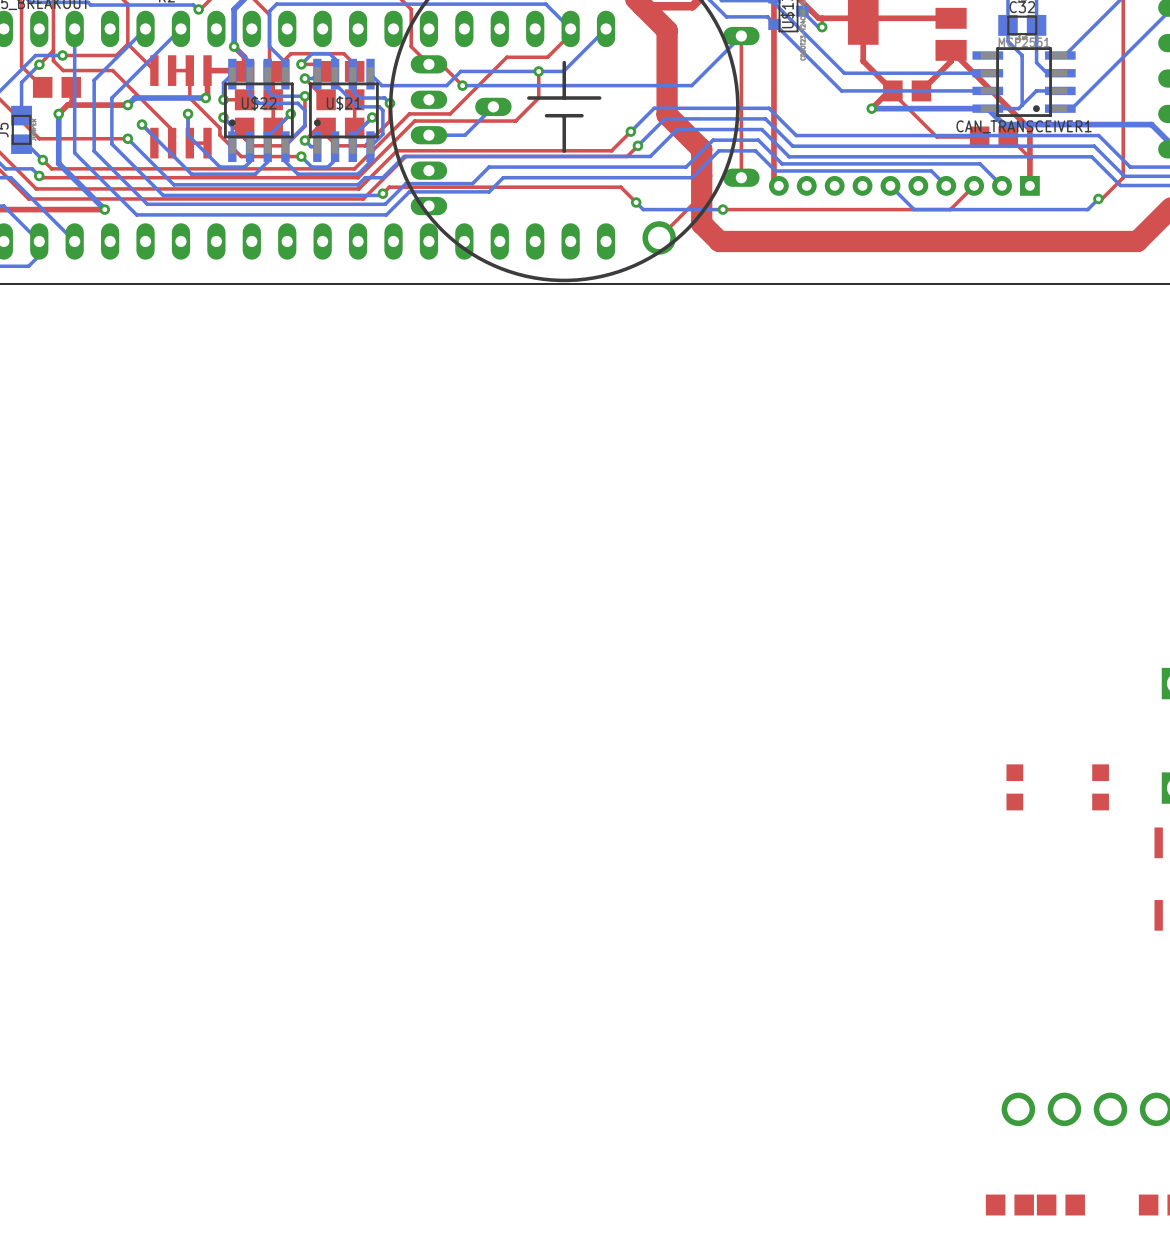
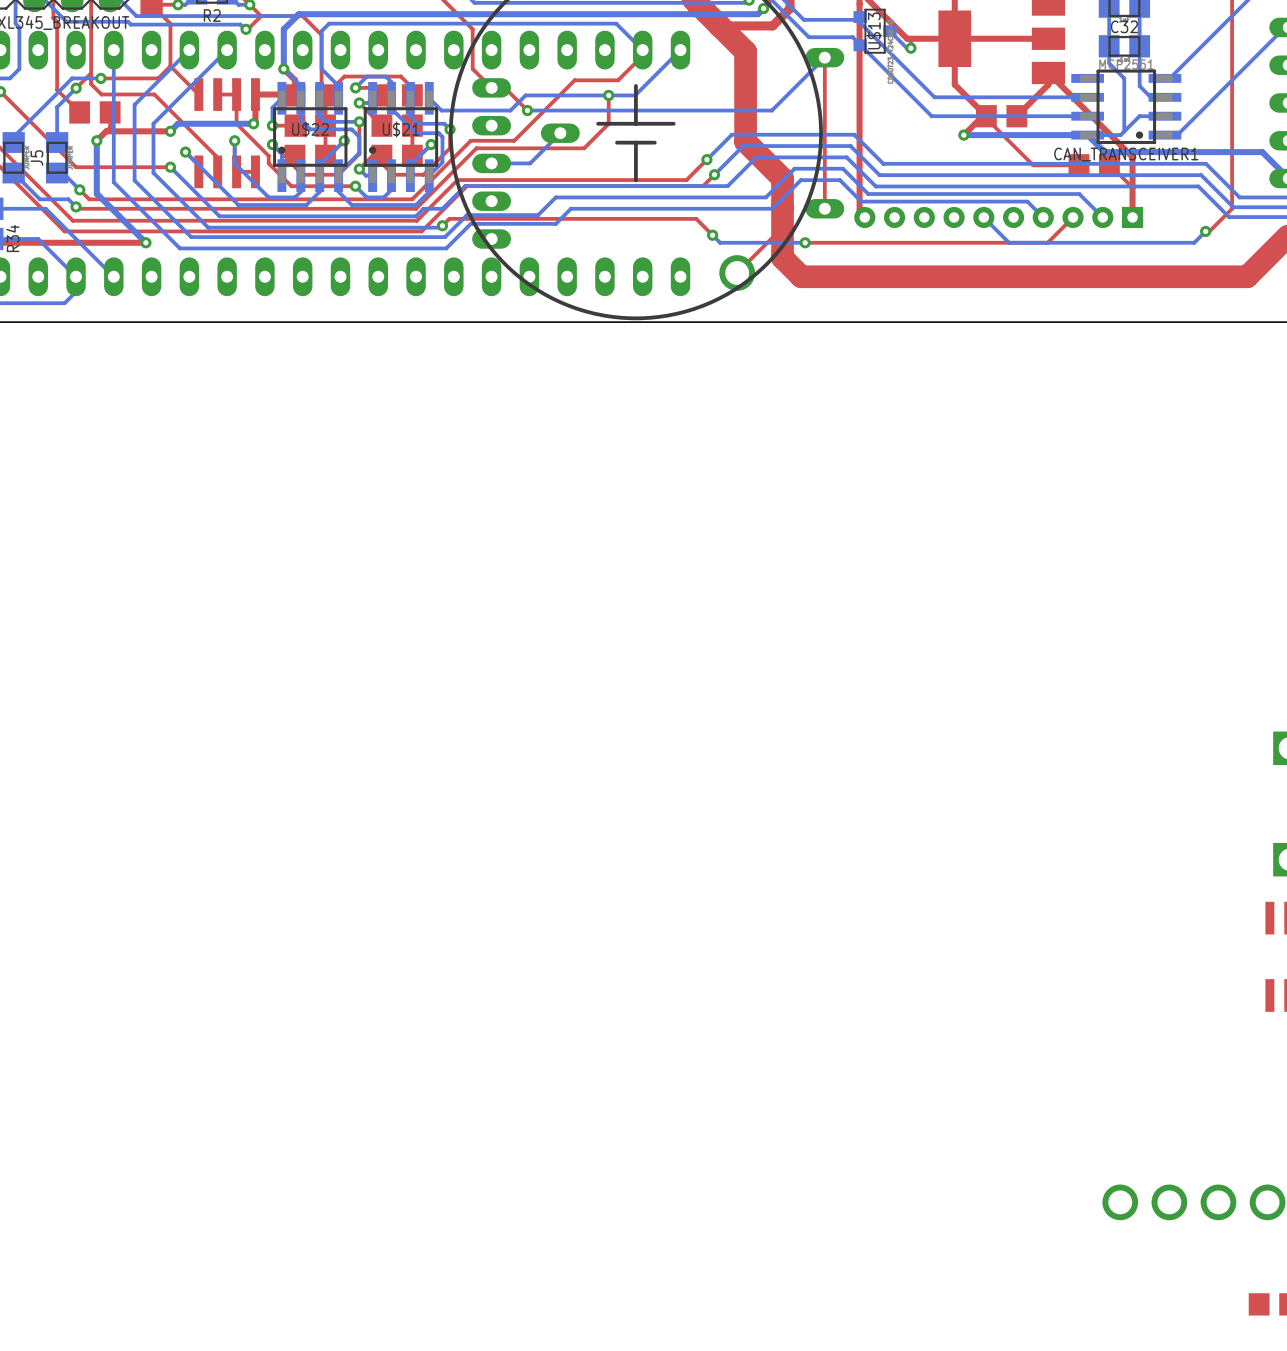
part: (1014, 787) -> none
part: (1100, 787) -> none
part: (1009, 1205) -> none
part: (1060, 1205) -> none

